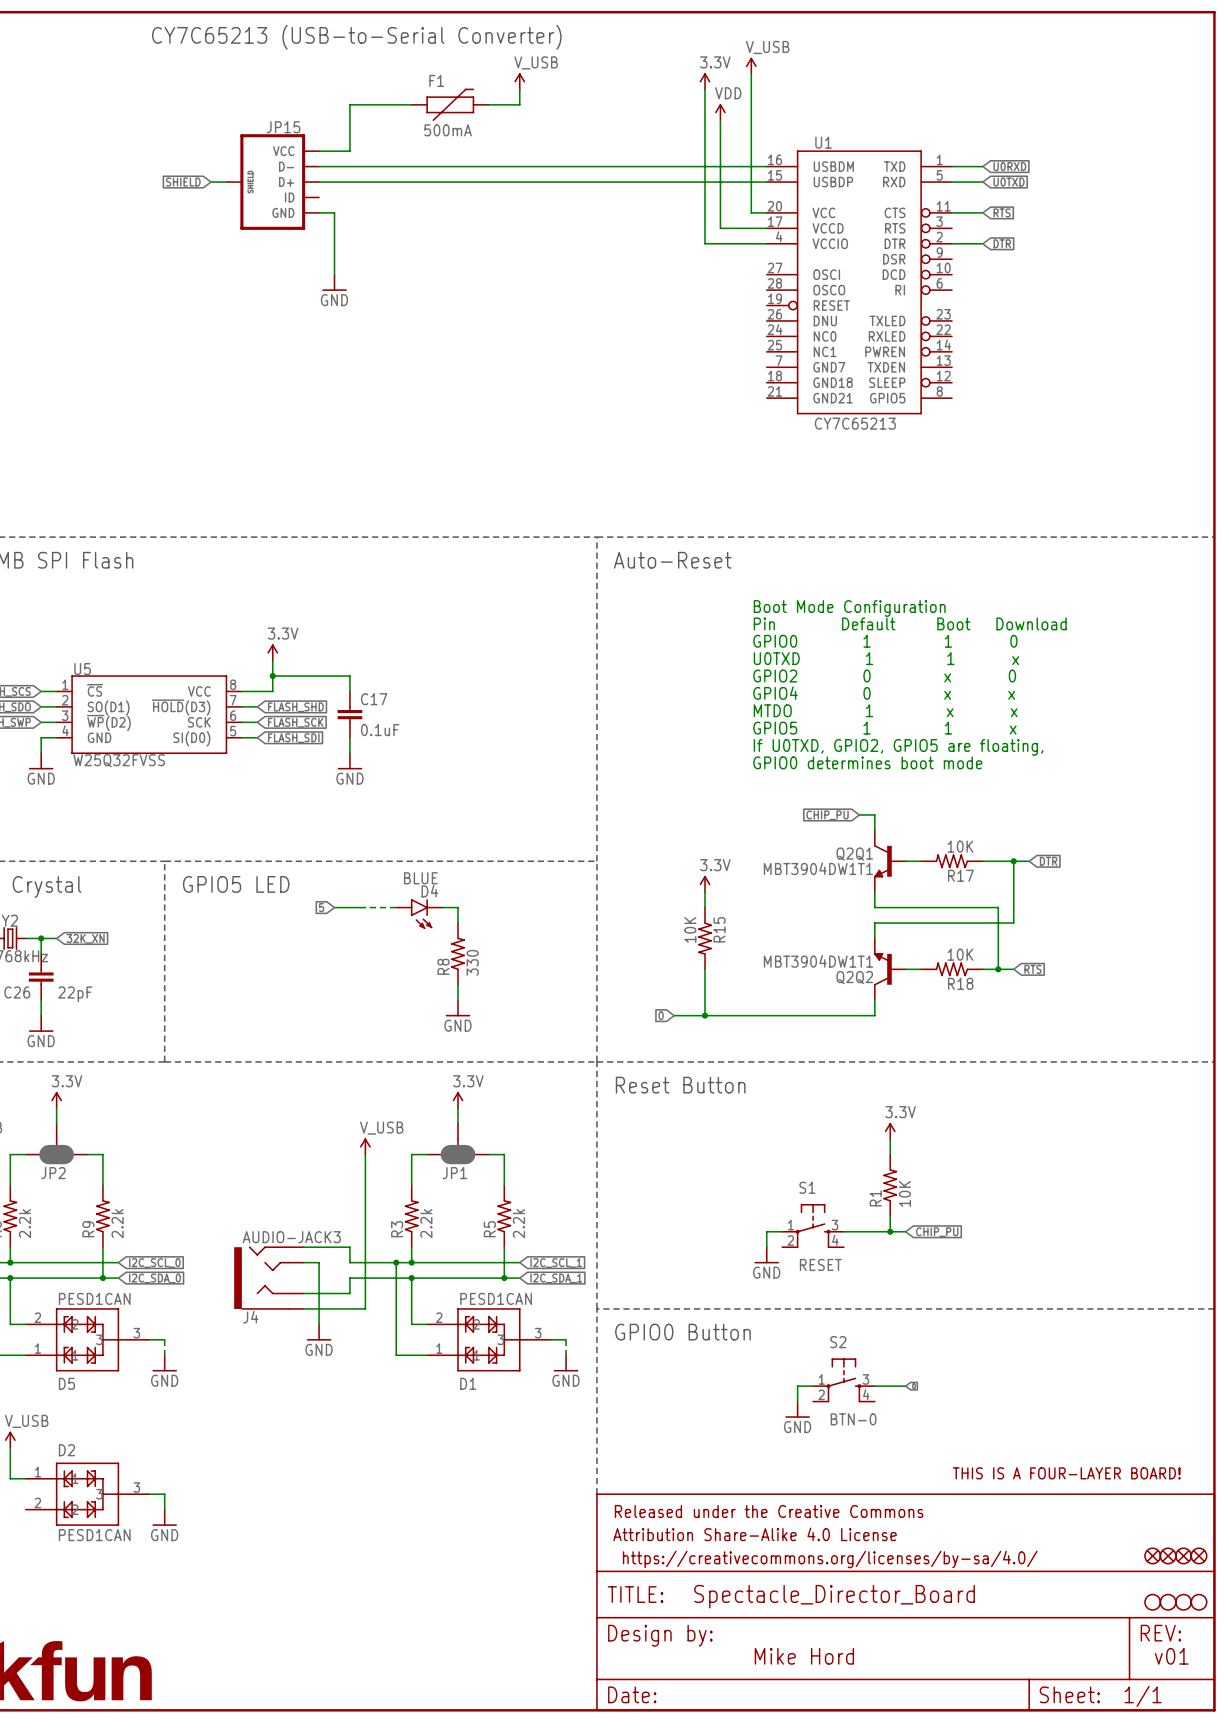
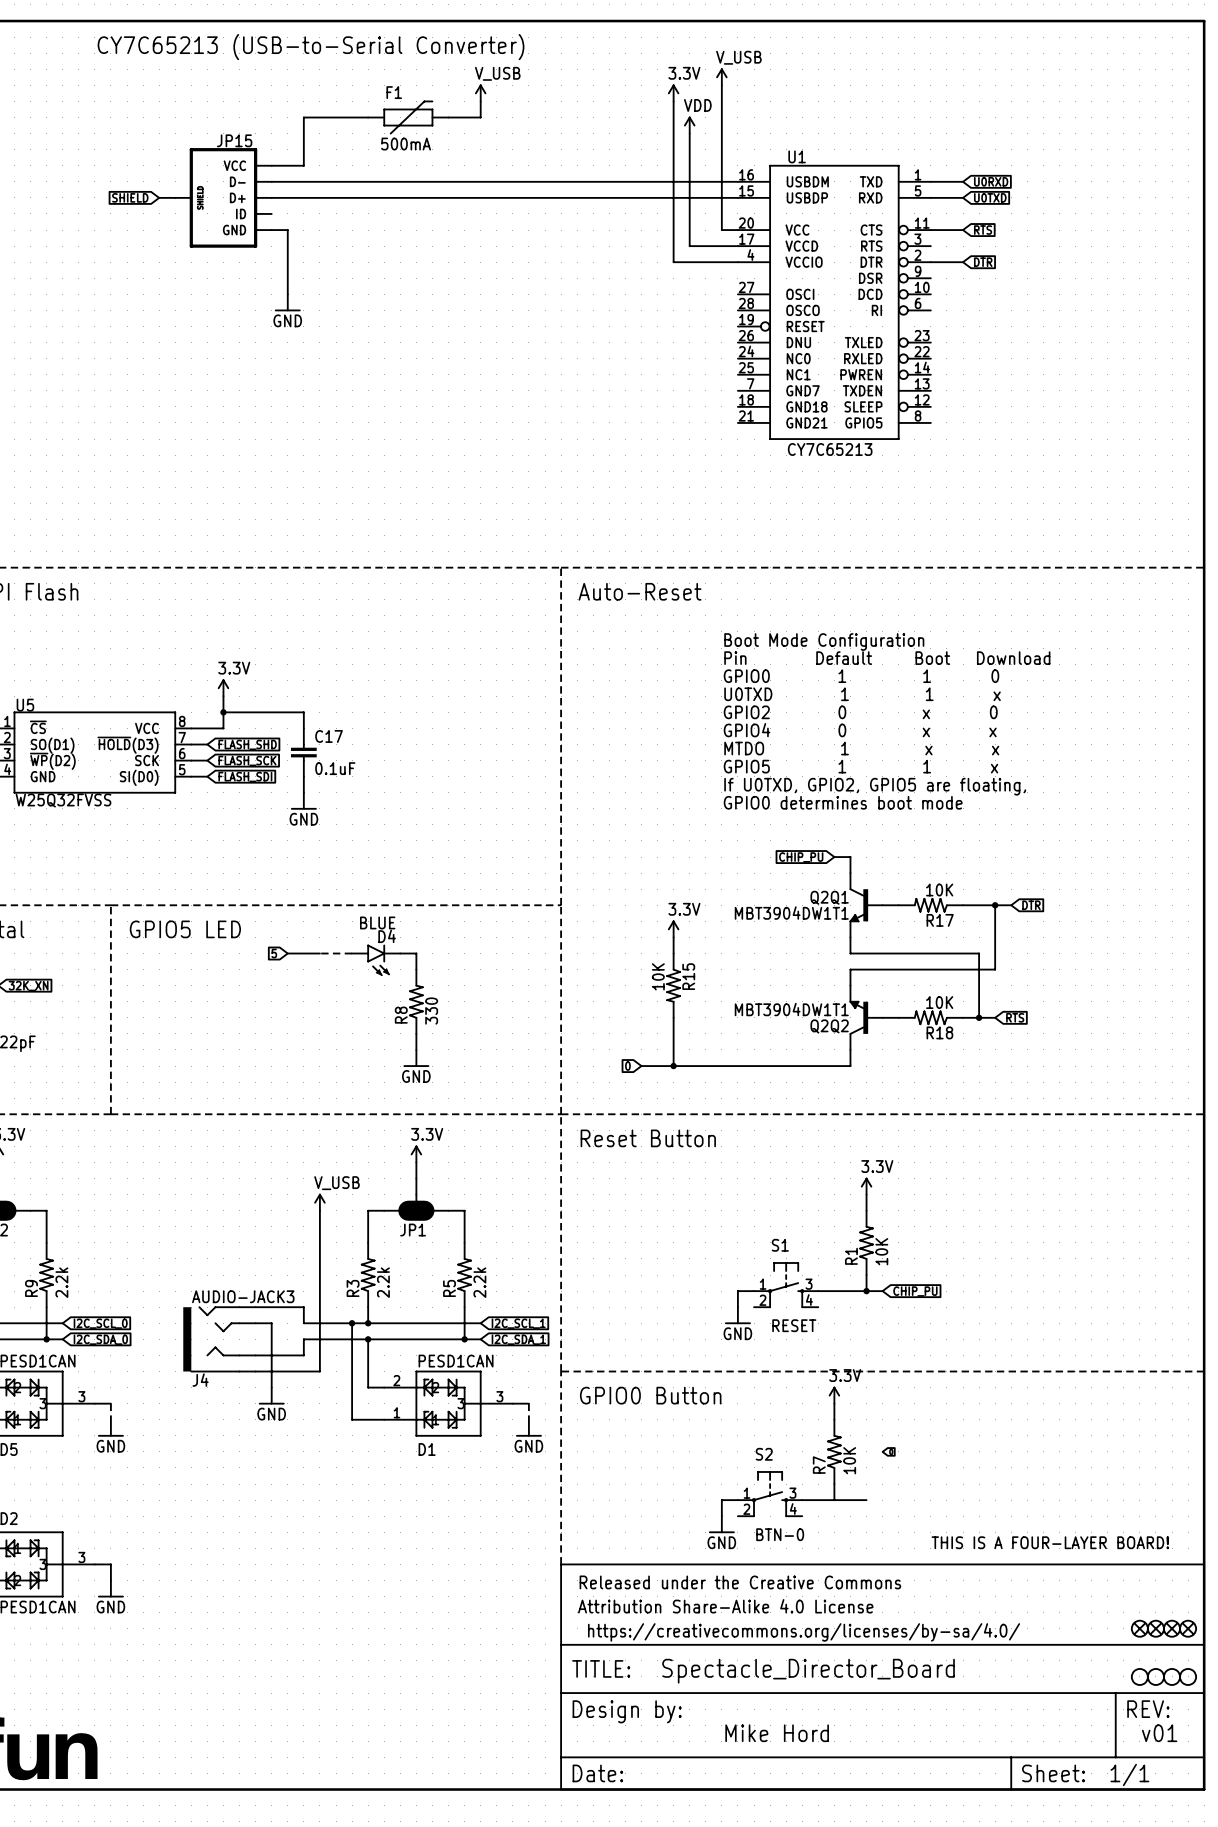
power symbol: none -> 3.3V (834, 1395)
wire: none -> (834, 1403) (834, 1419)
S2 position: (843, 1380) -> (770, 1493)
wire: (813, 1386) (797, 1386) (797, 1401) -> (737, 1500) (721, 1500) (721, 1516)
R7: none -> 10K (834, 1451)
wire: (874, 1386) (905, 1386) -> none
power symbol position: GND (797, 1409) -> GND (721, 1524)
wire: none -> (834, 1484) (834, 1500)
wire: none -> (802, 1500) (866, 1500)

